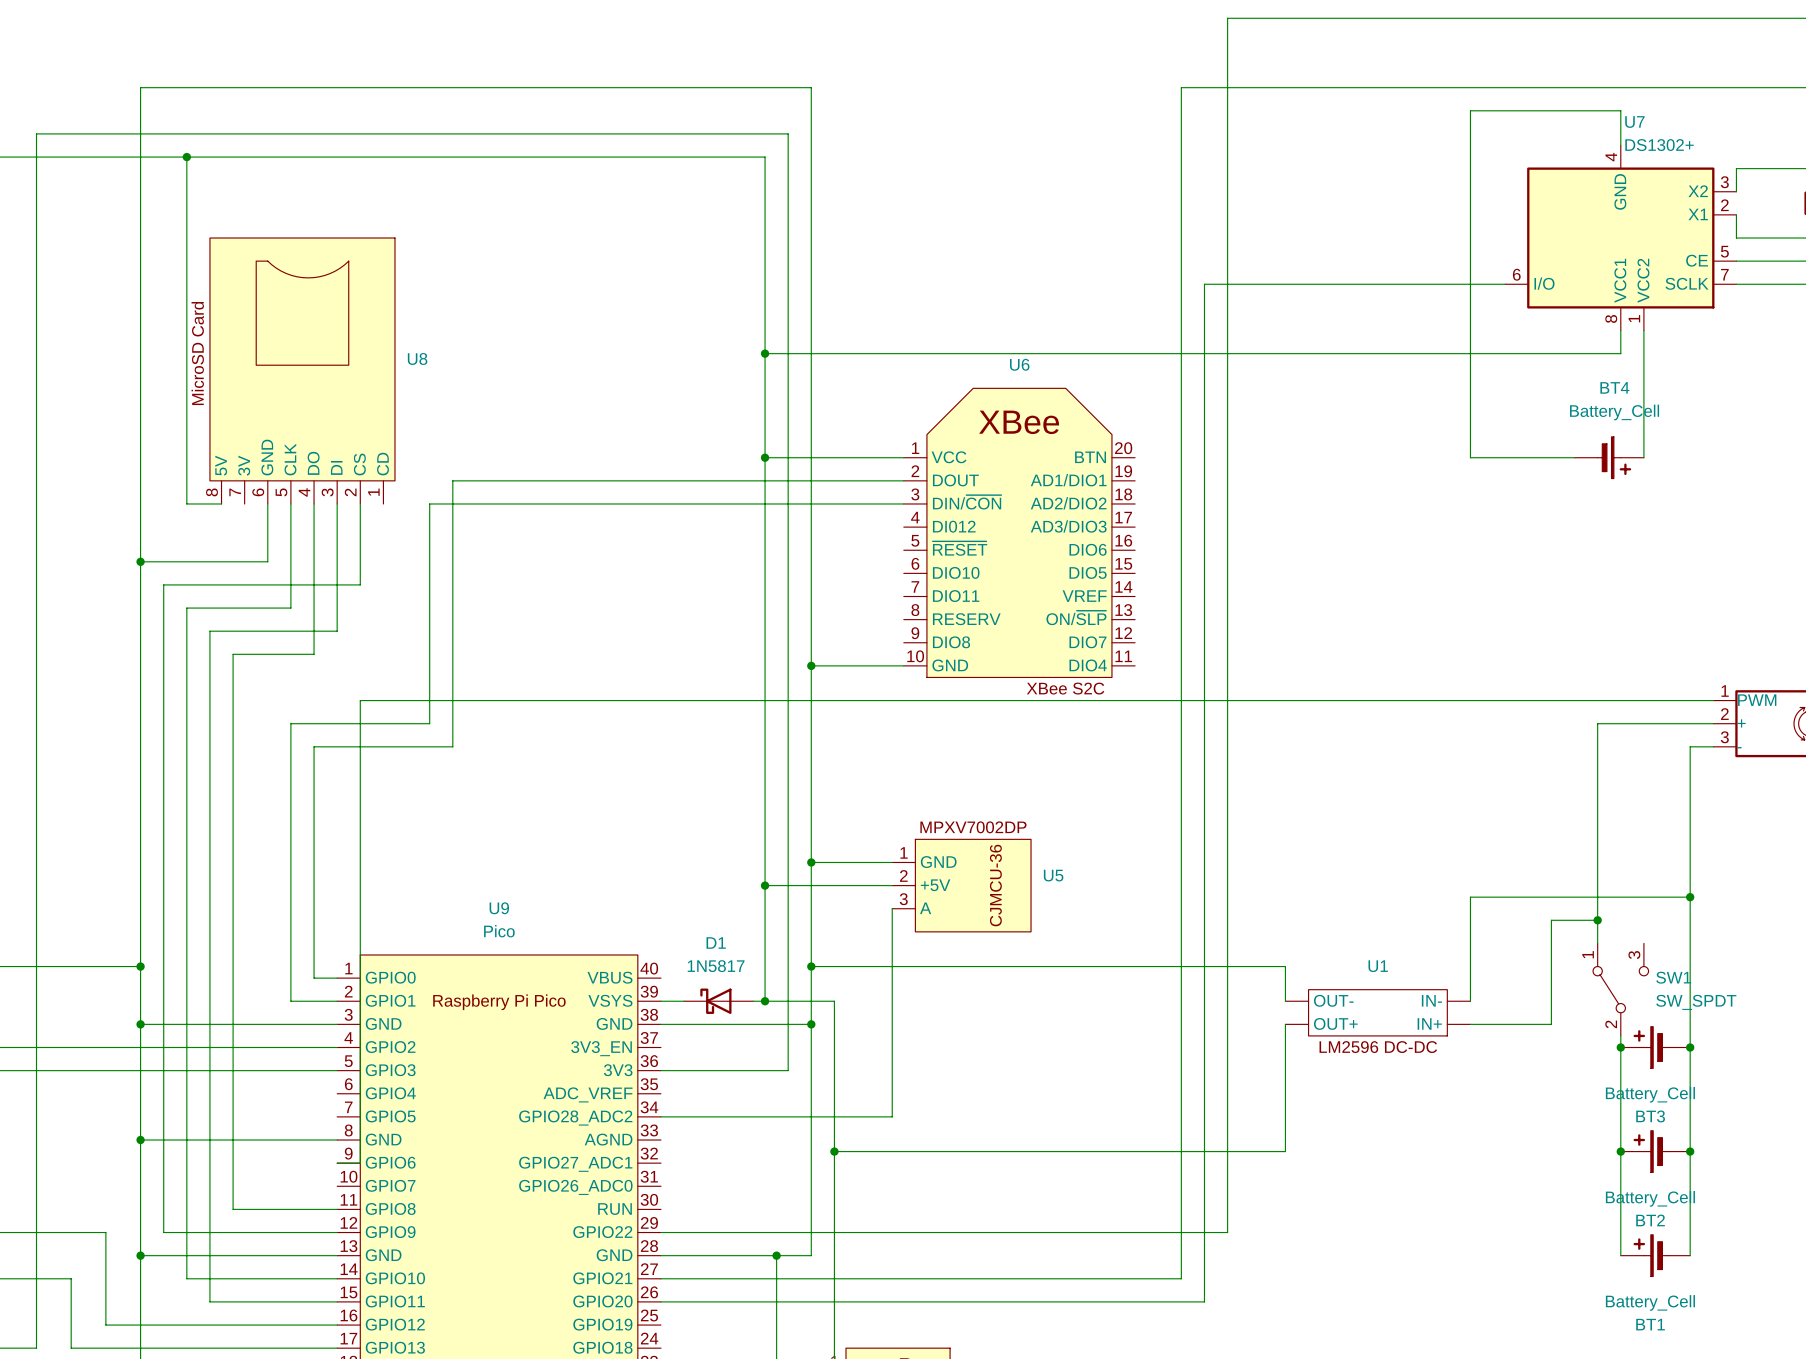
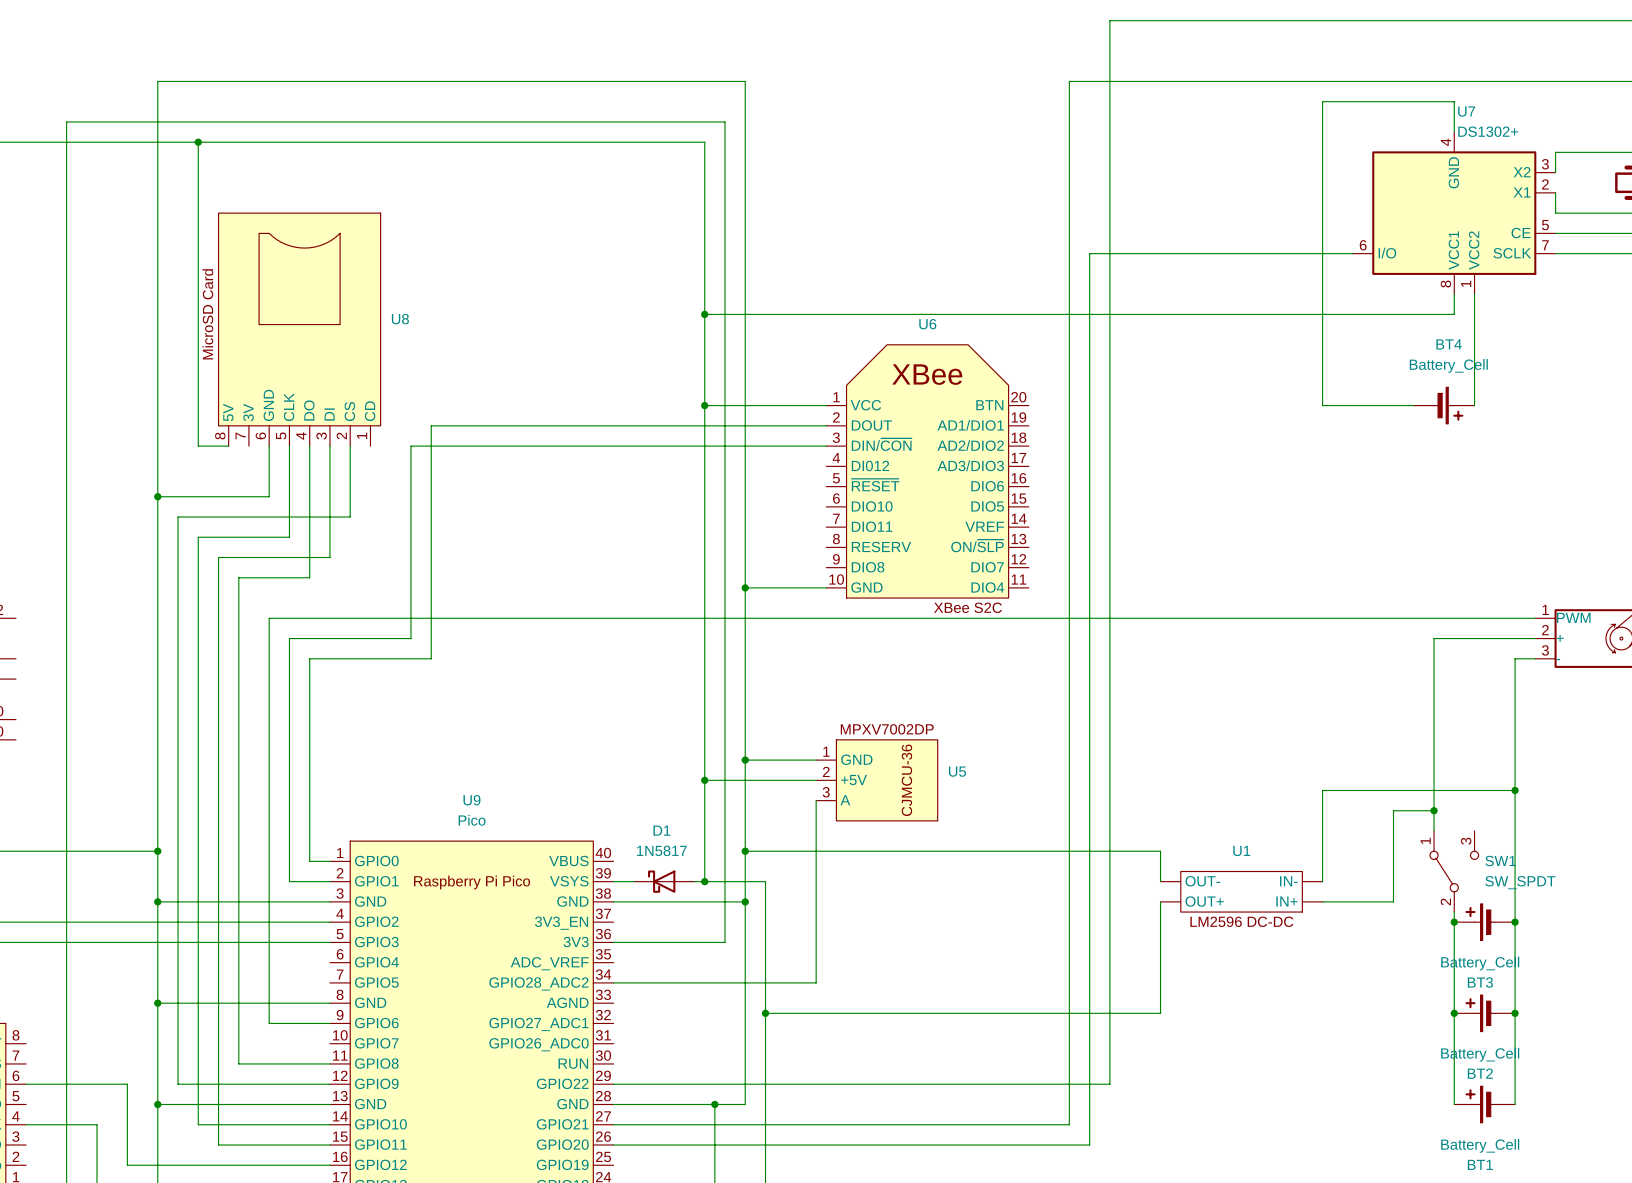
wire: (360, 700) (360, 1163) (337, 1163) -> (350, 618) (269, 618) (269, 1023) (329, 1023)

